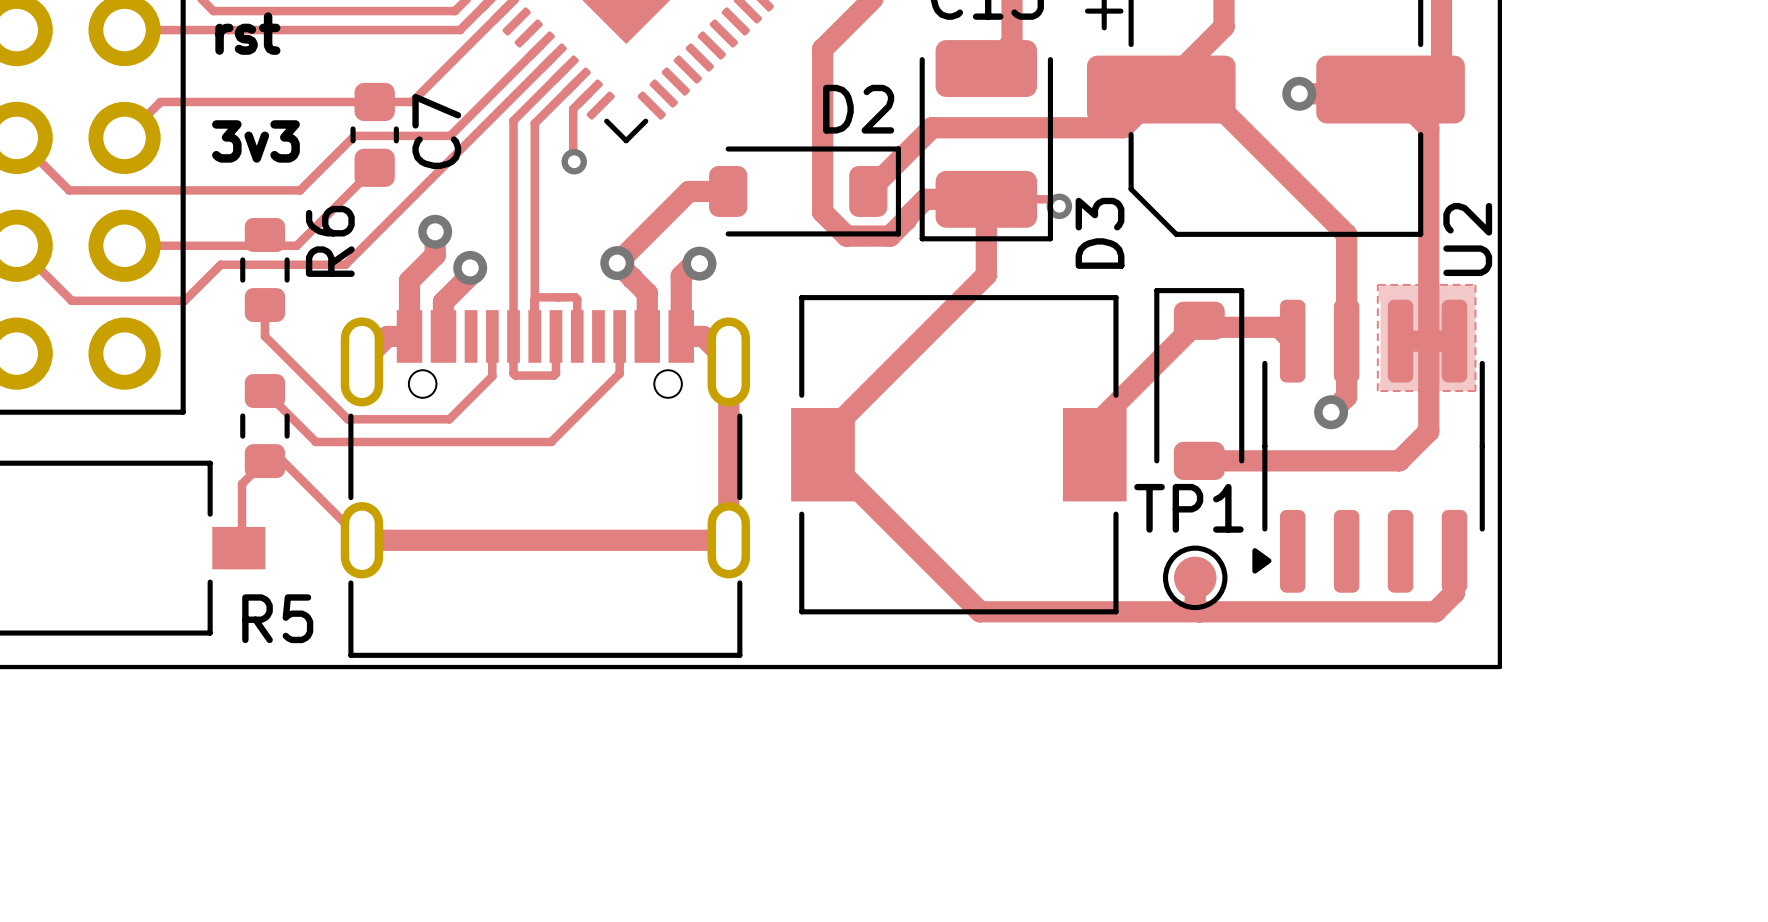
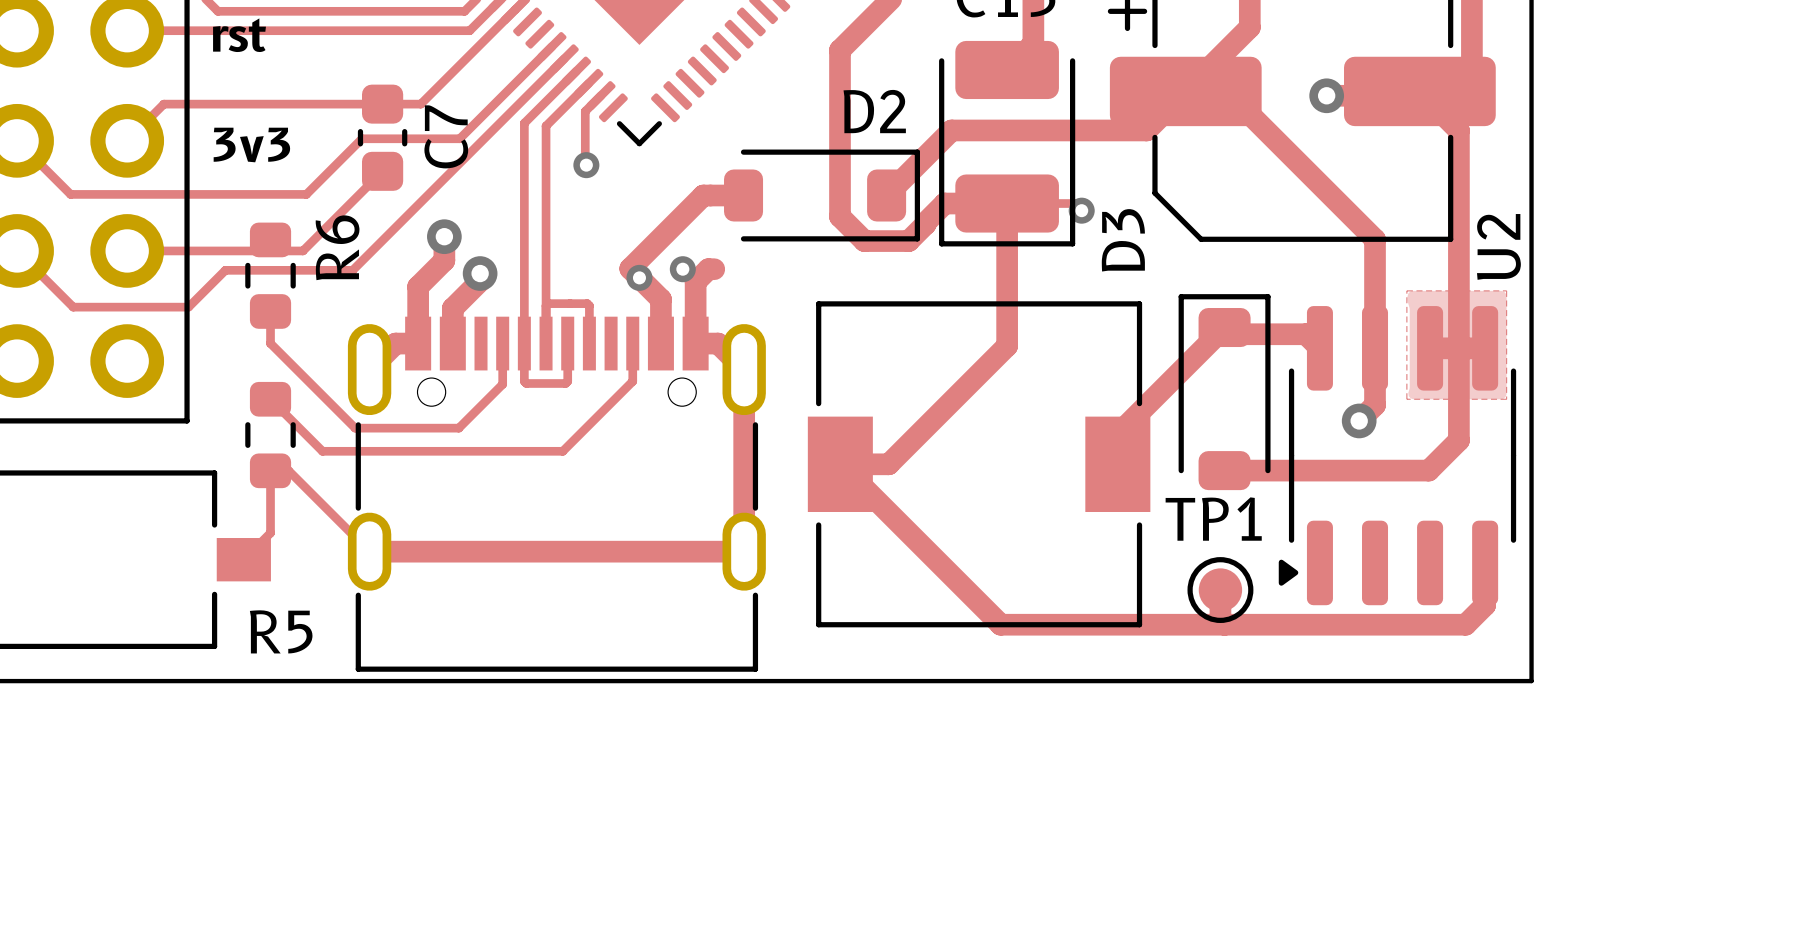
via size: [600, 246, 635, 281] -> [626, 264, 653, 291]
via: none -> (682, 269)
via: (699, 263) -> none
track: (986, 275) (822, 438) (822, 454) -> (1007, 280) (1007, 345) (888, 464) (840, 464)
track: (264, 461) (241, 484) (241, 544) -> (270, 470) (270, 533) (247, 556)

